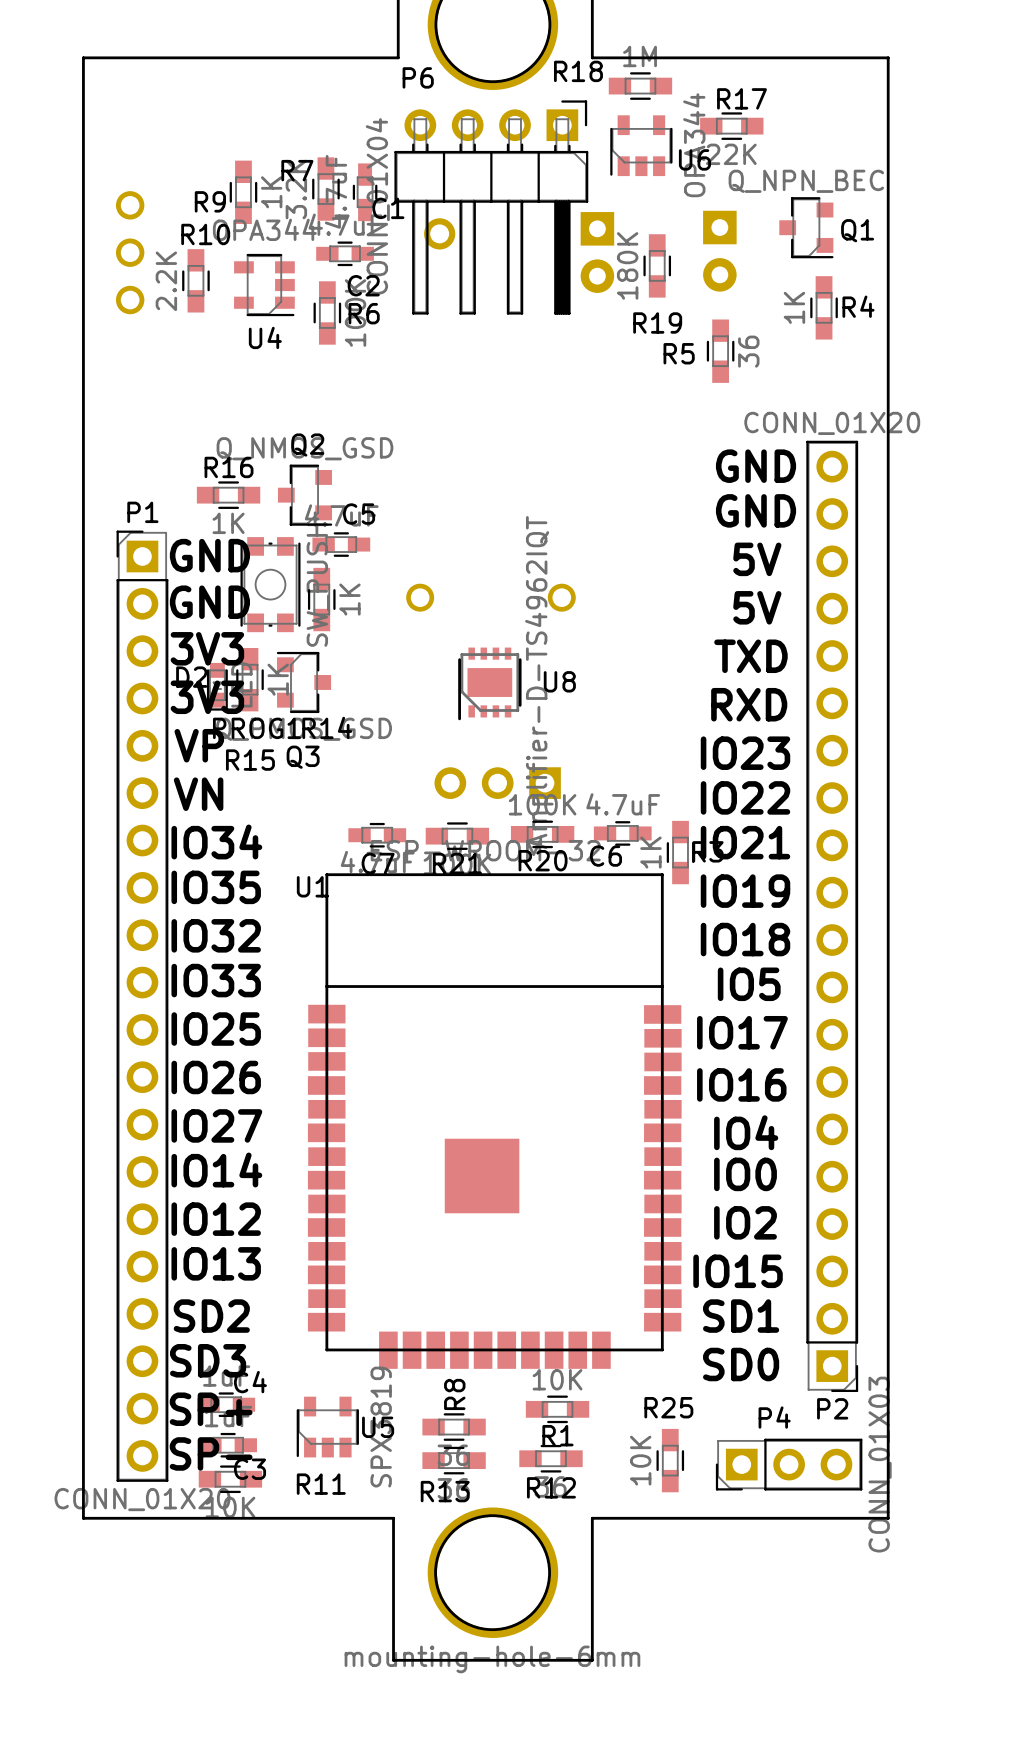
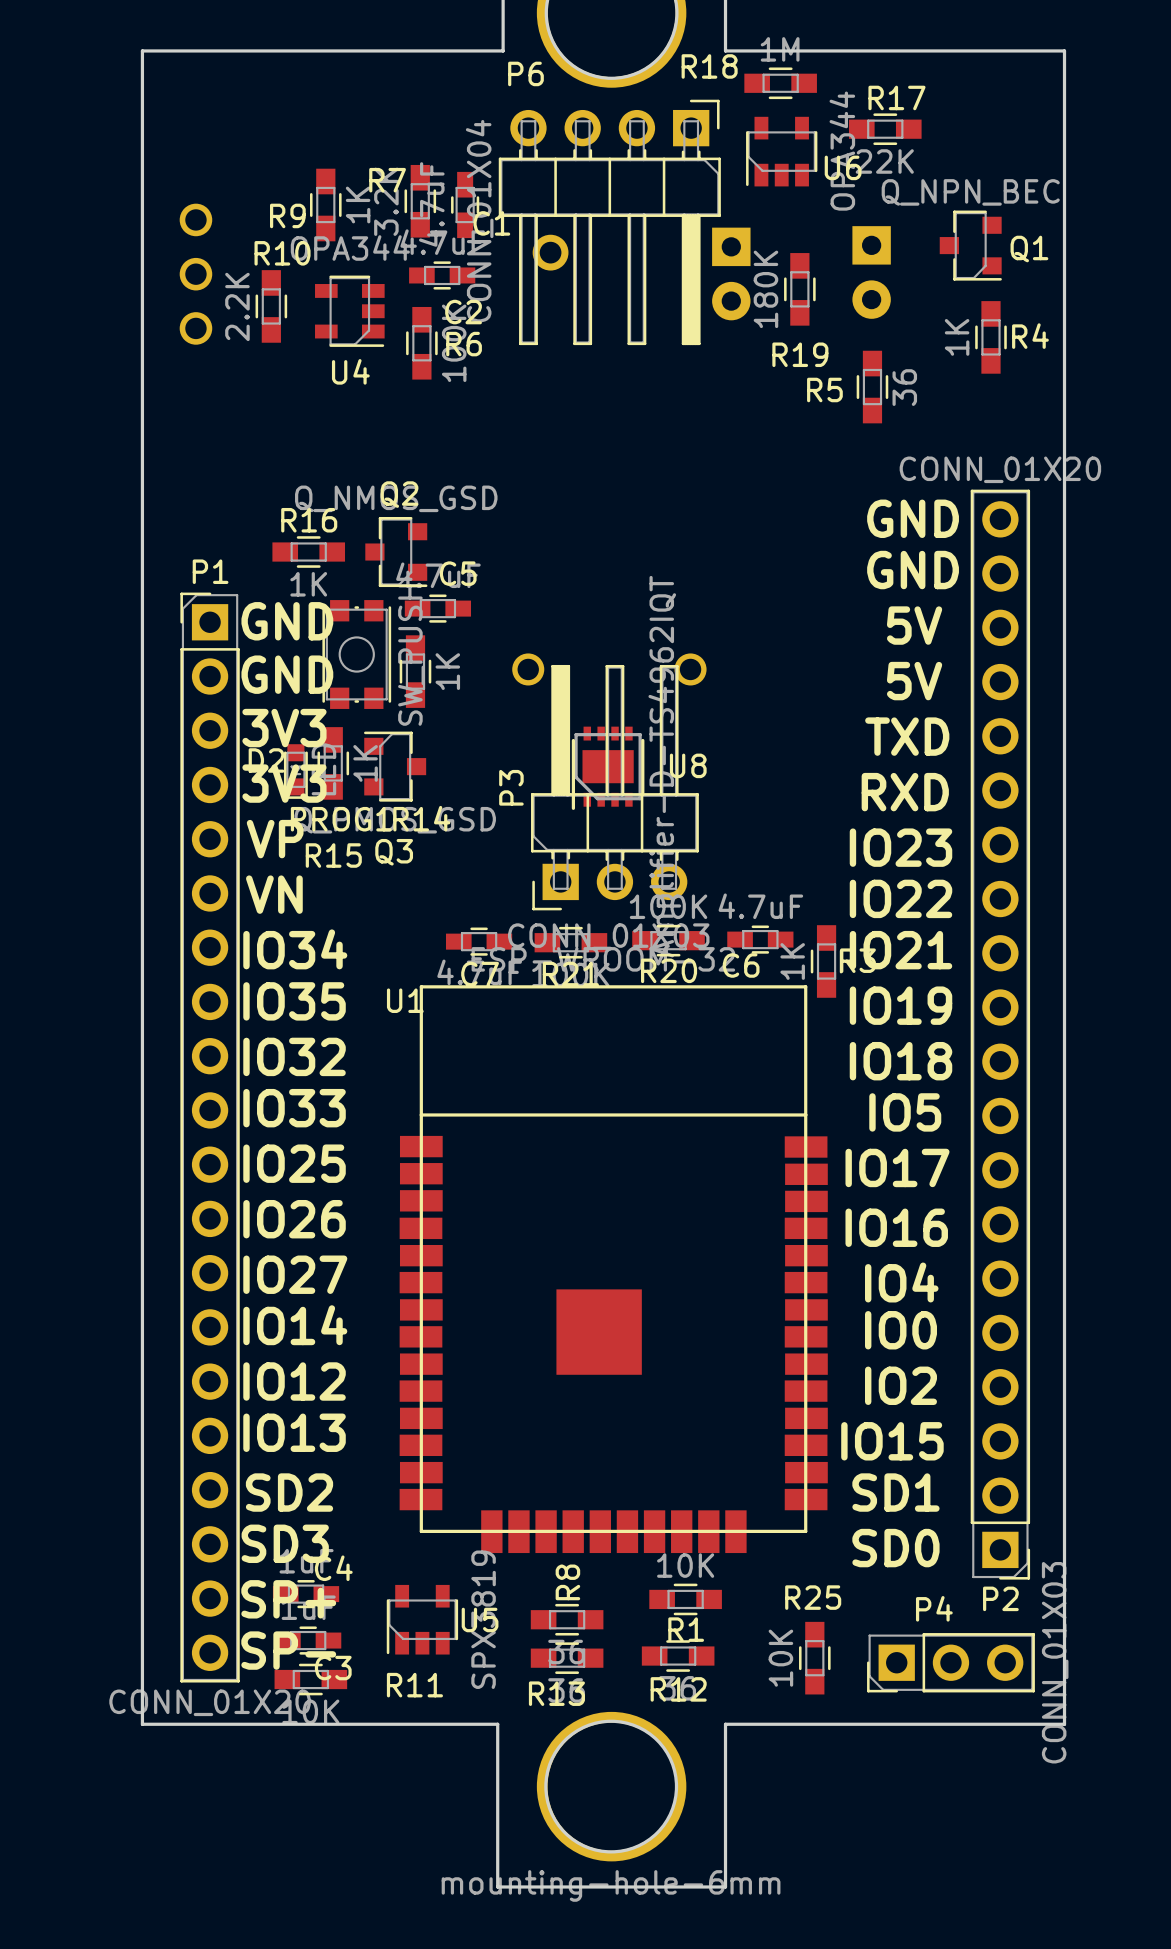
P3 side: bottom (497, 783) -> top (614, 787)

